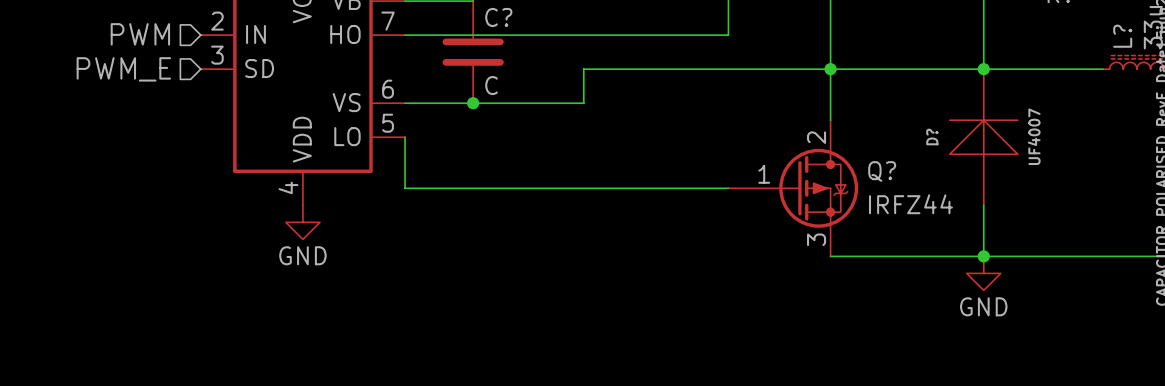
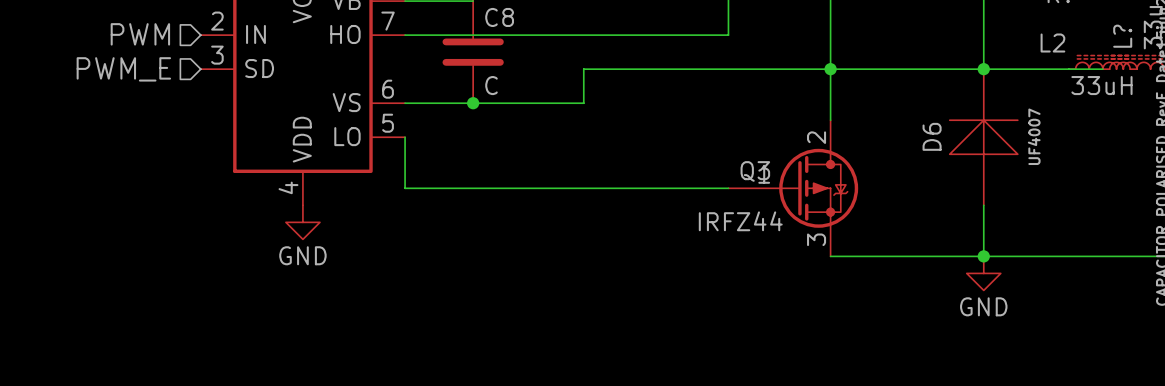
C? name: C? (498, 17) -> C8 (499, 17)
L2: none -> 33uH (1102, 62)
D? name: D? (932, 137) -> D6 (932, 136)
Q? name: Q? (882, 171) -> Q3 (755, 171)
Q? value position: IRFZ44 (910, 204) -> IRFZ44 (740, 221)

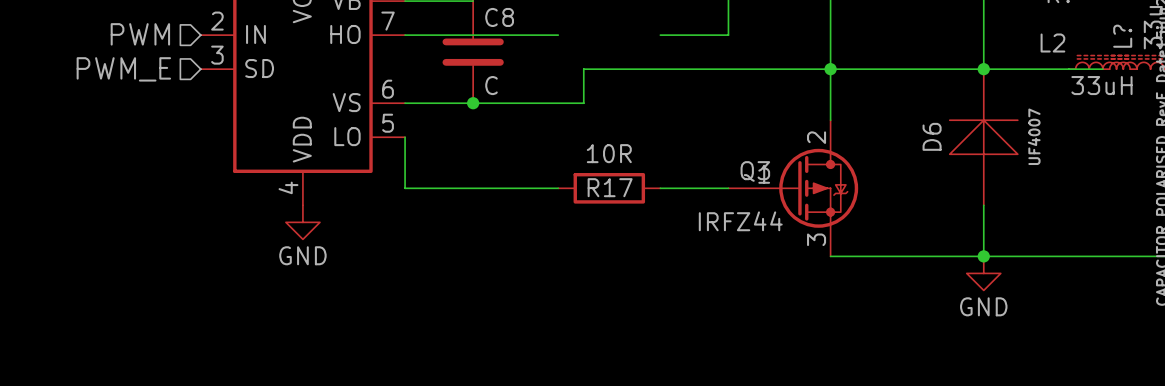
wire: (558, 35) (660, 35) -> none
wire: (558, 188) (660, 188) -> none
R17: none -> 10R (609, 188)

